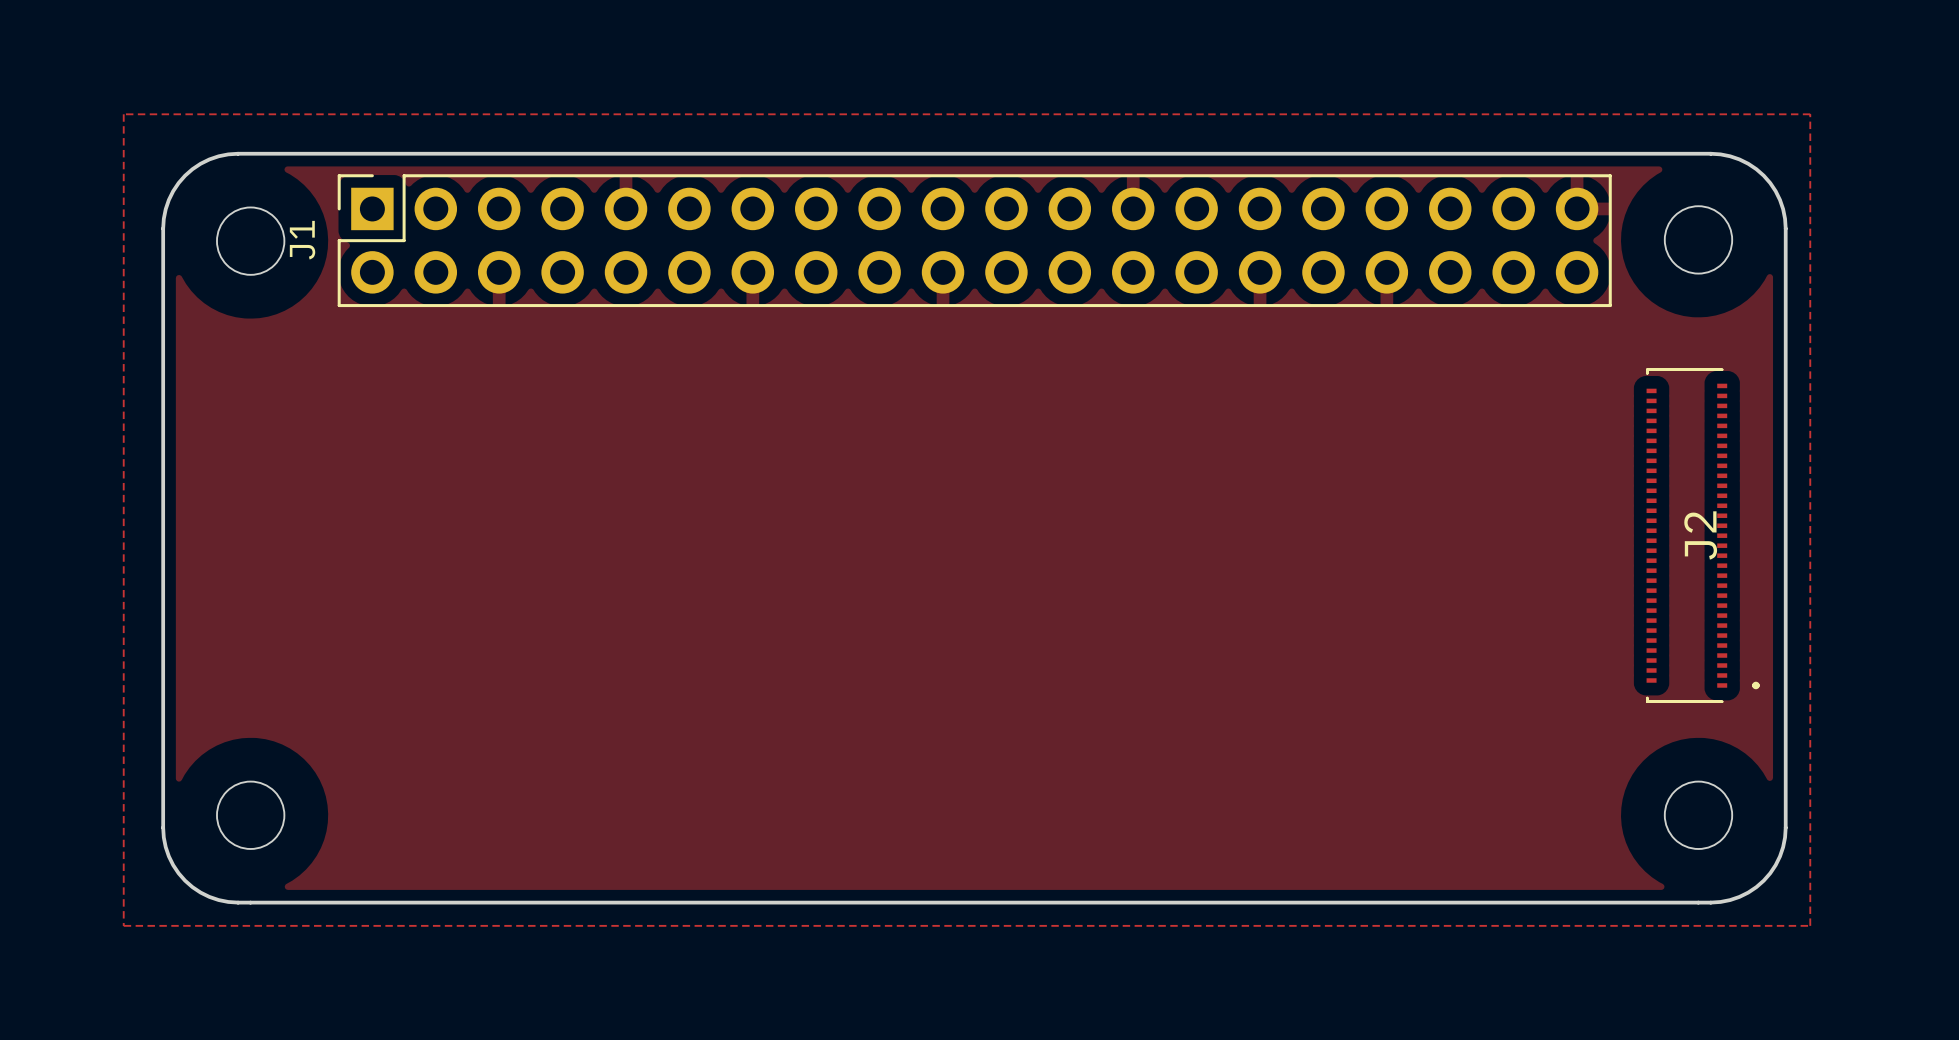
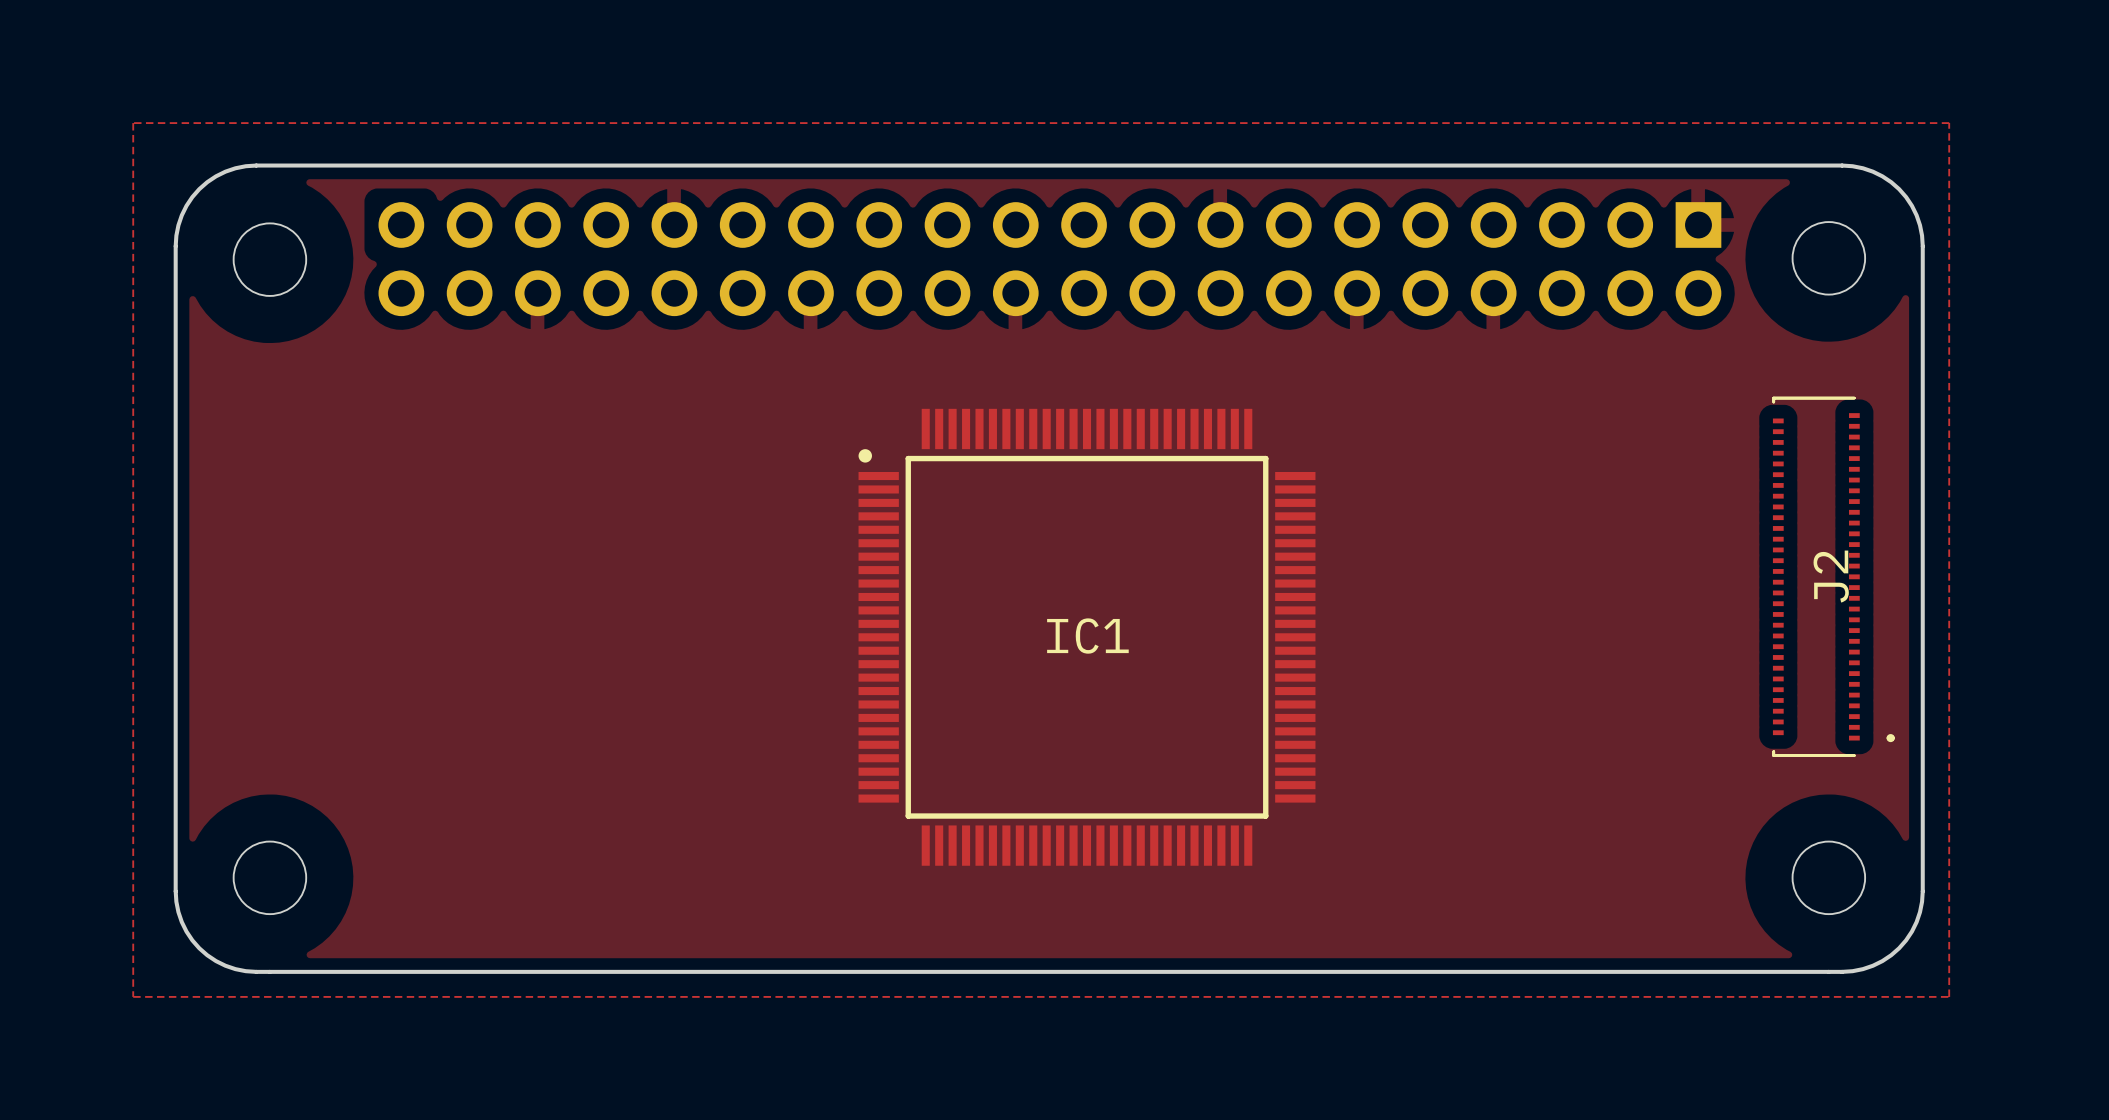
J1 side: top (974, 240) -> bottom (1049, 259)
IC1: none -> (1087, 637)

